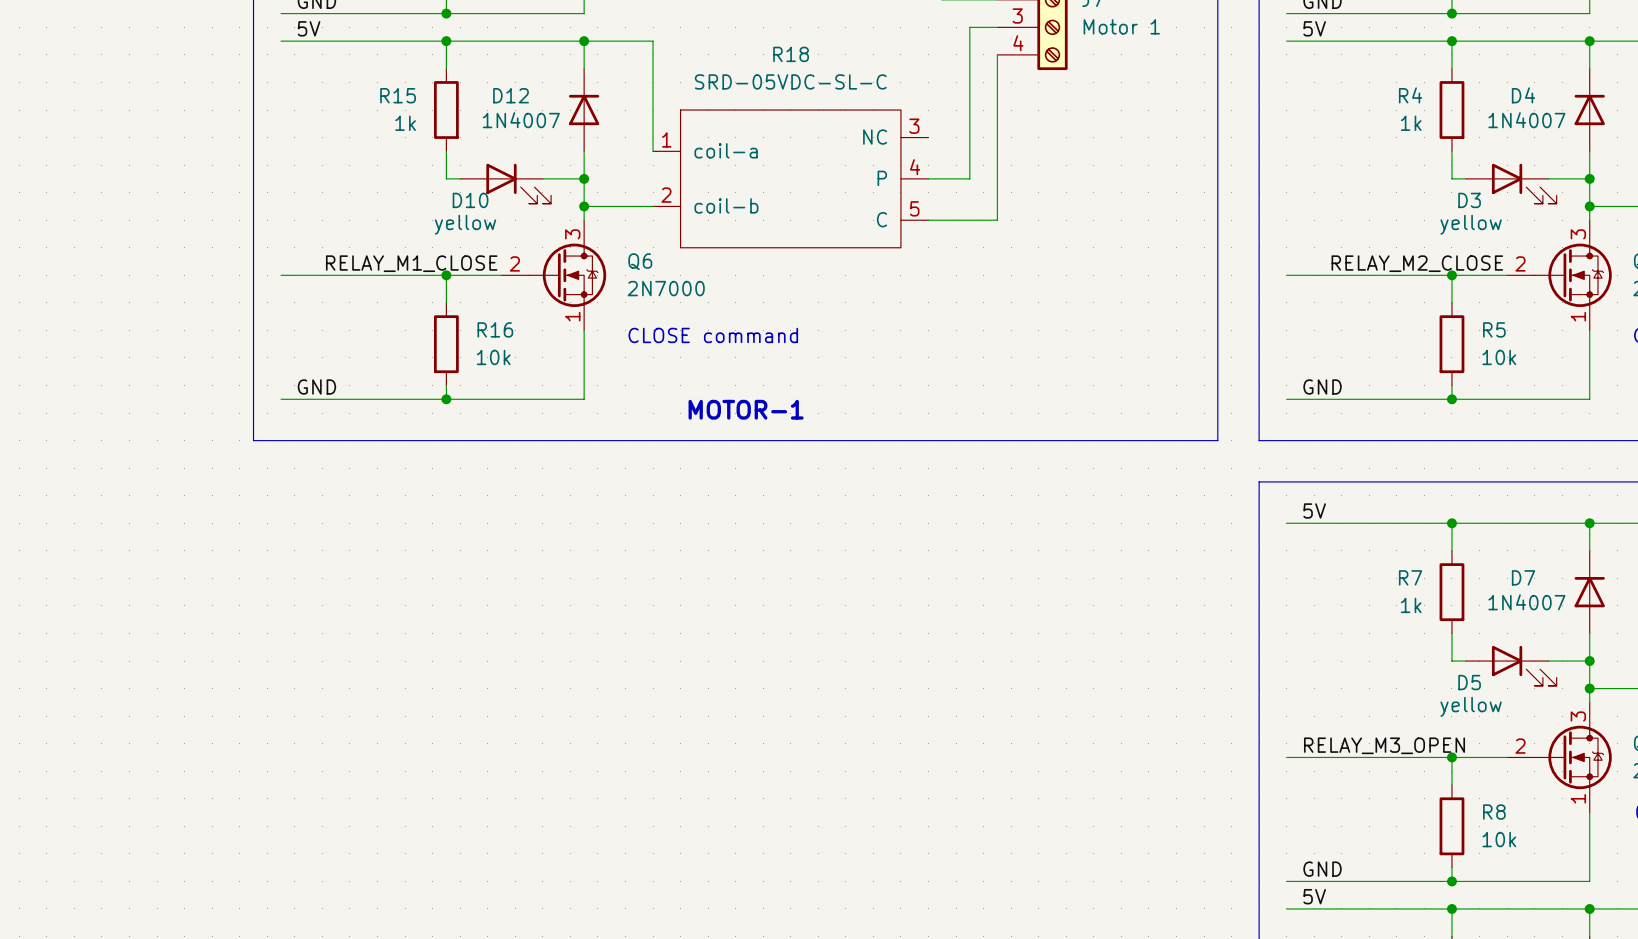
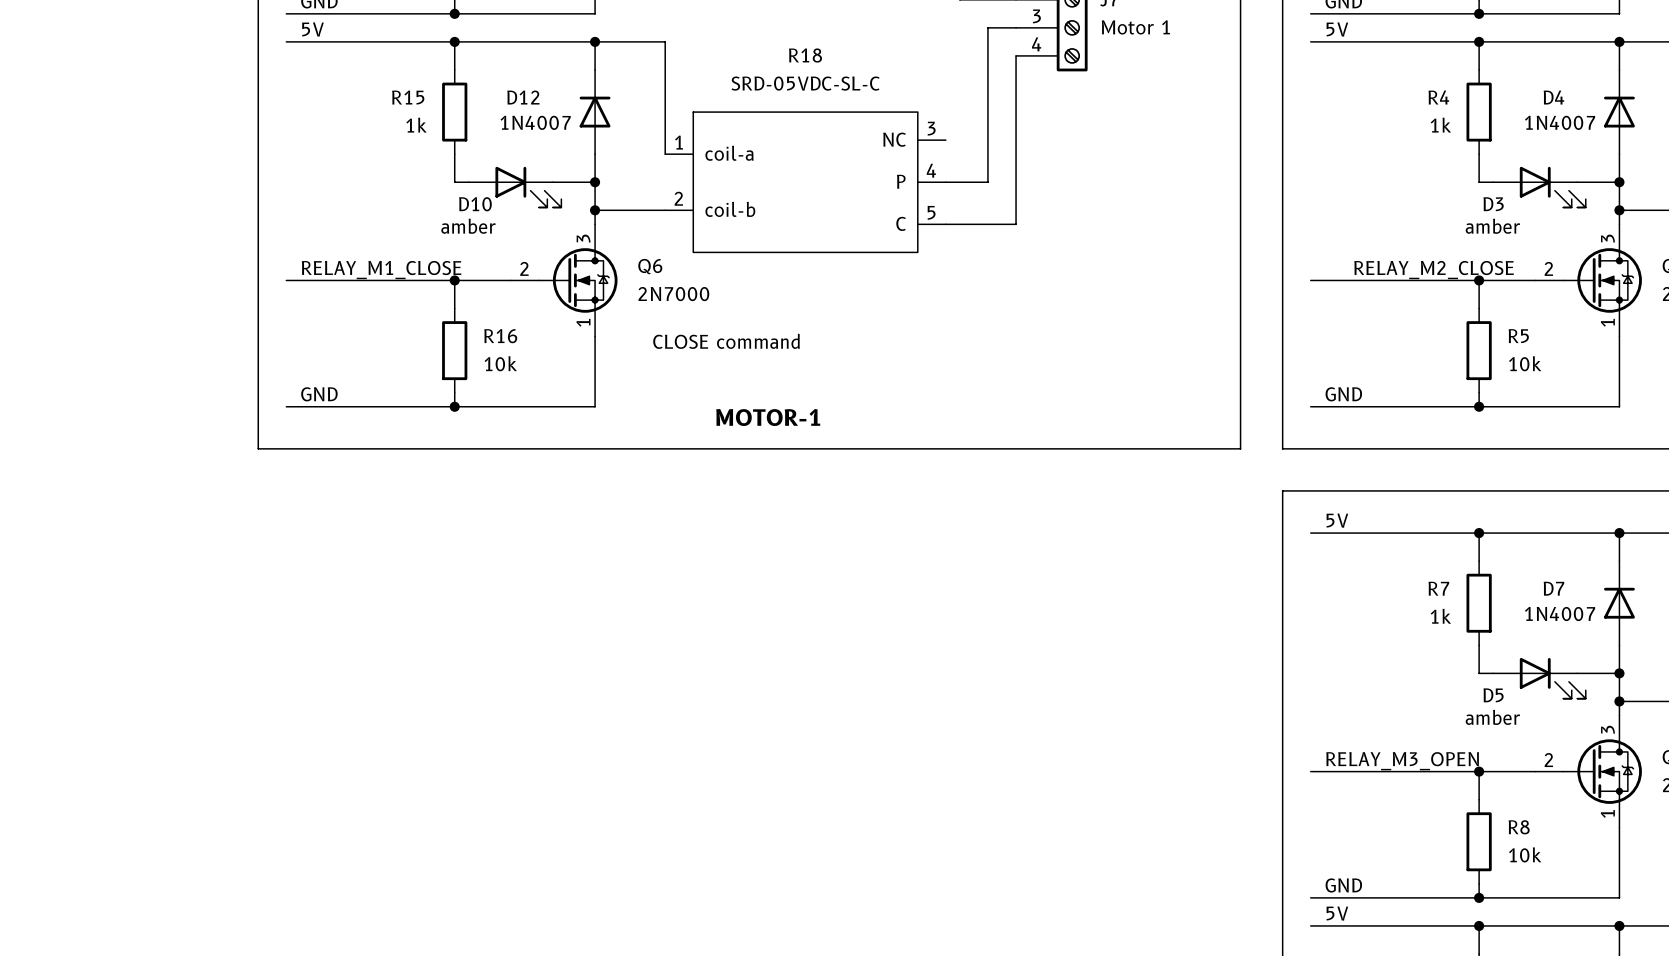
D10 value: yellow (465, 224) -> amber (468, 226)
D3 value: yellow (1471, 224) -> amber (1492, 226)
label position: RELAY_M1_CLOSE (411, 263) -> RELAY_M1_CLOSE (381, 270)
D5 value: yellow (1471, 706) -> amber (1492, 717)

